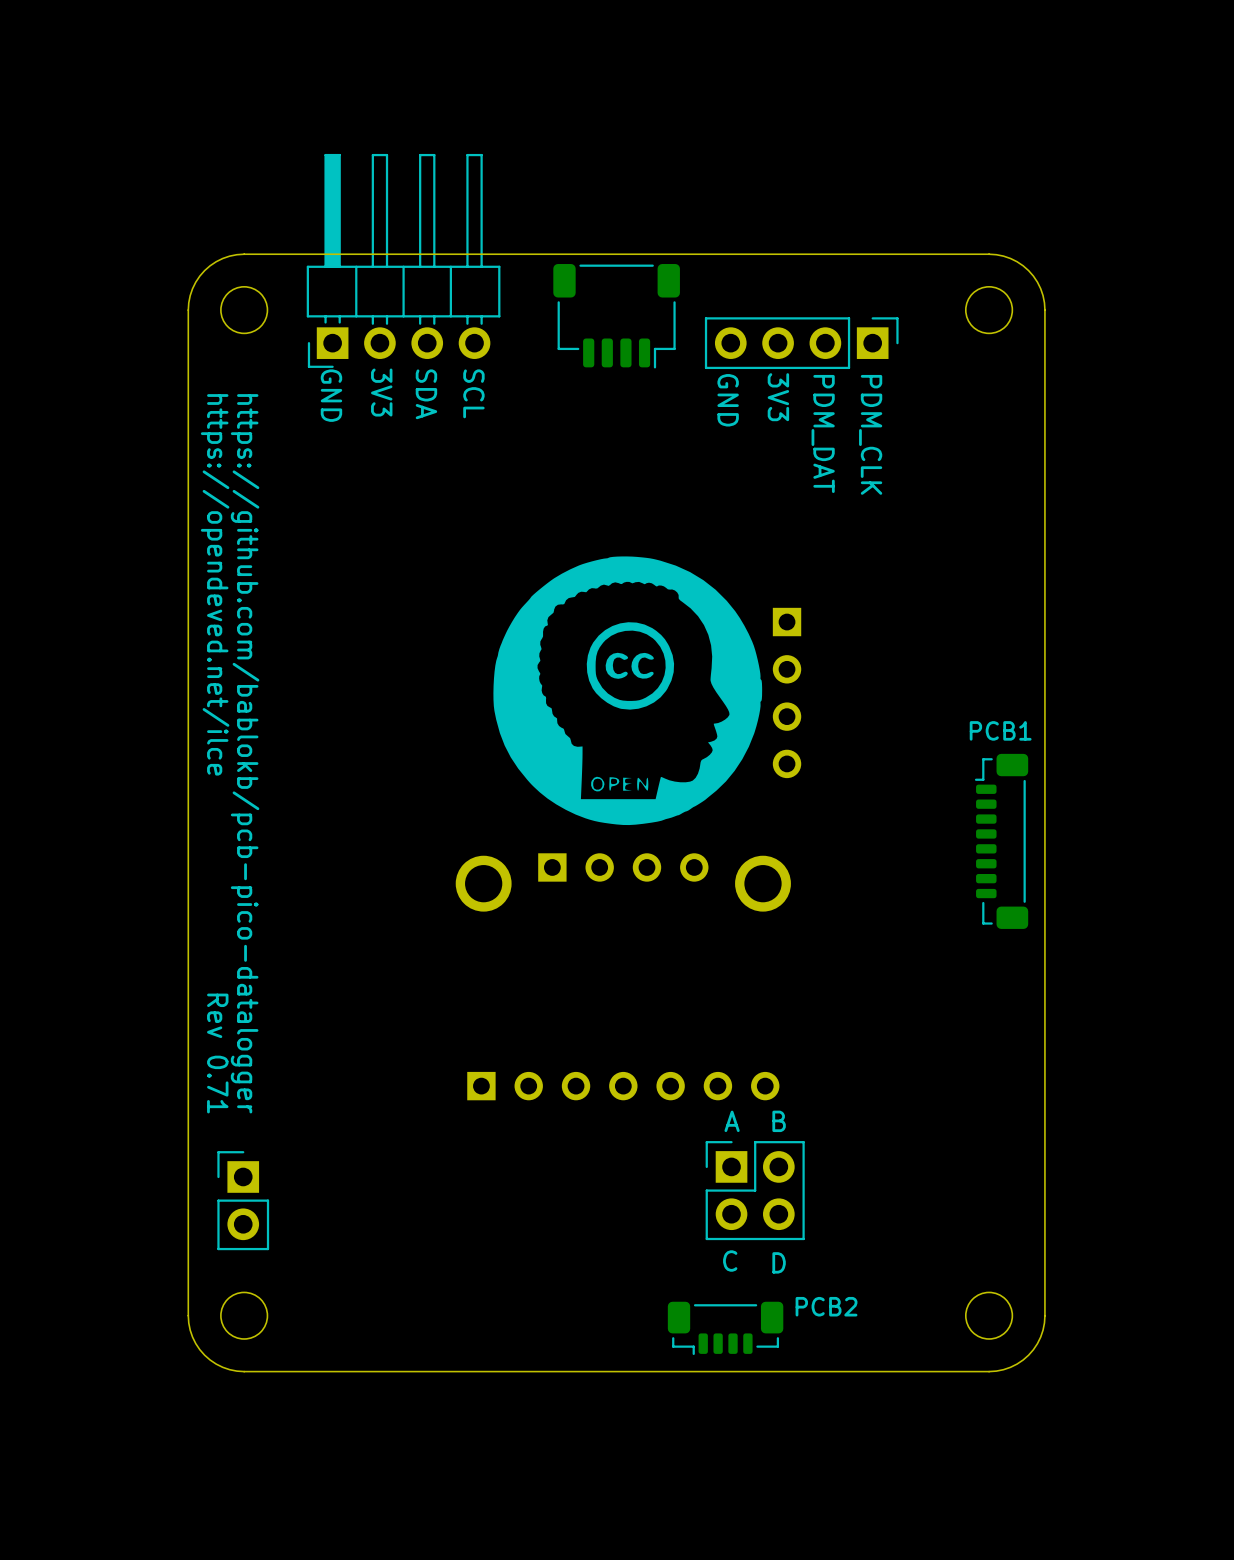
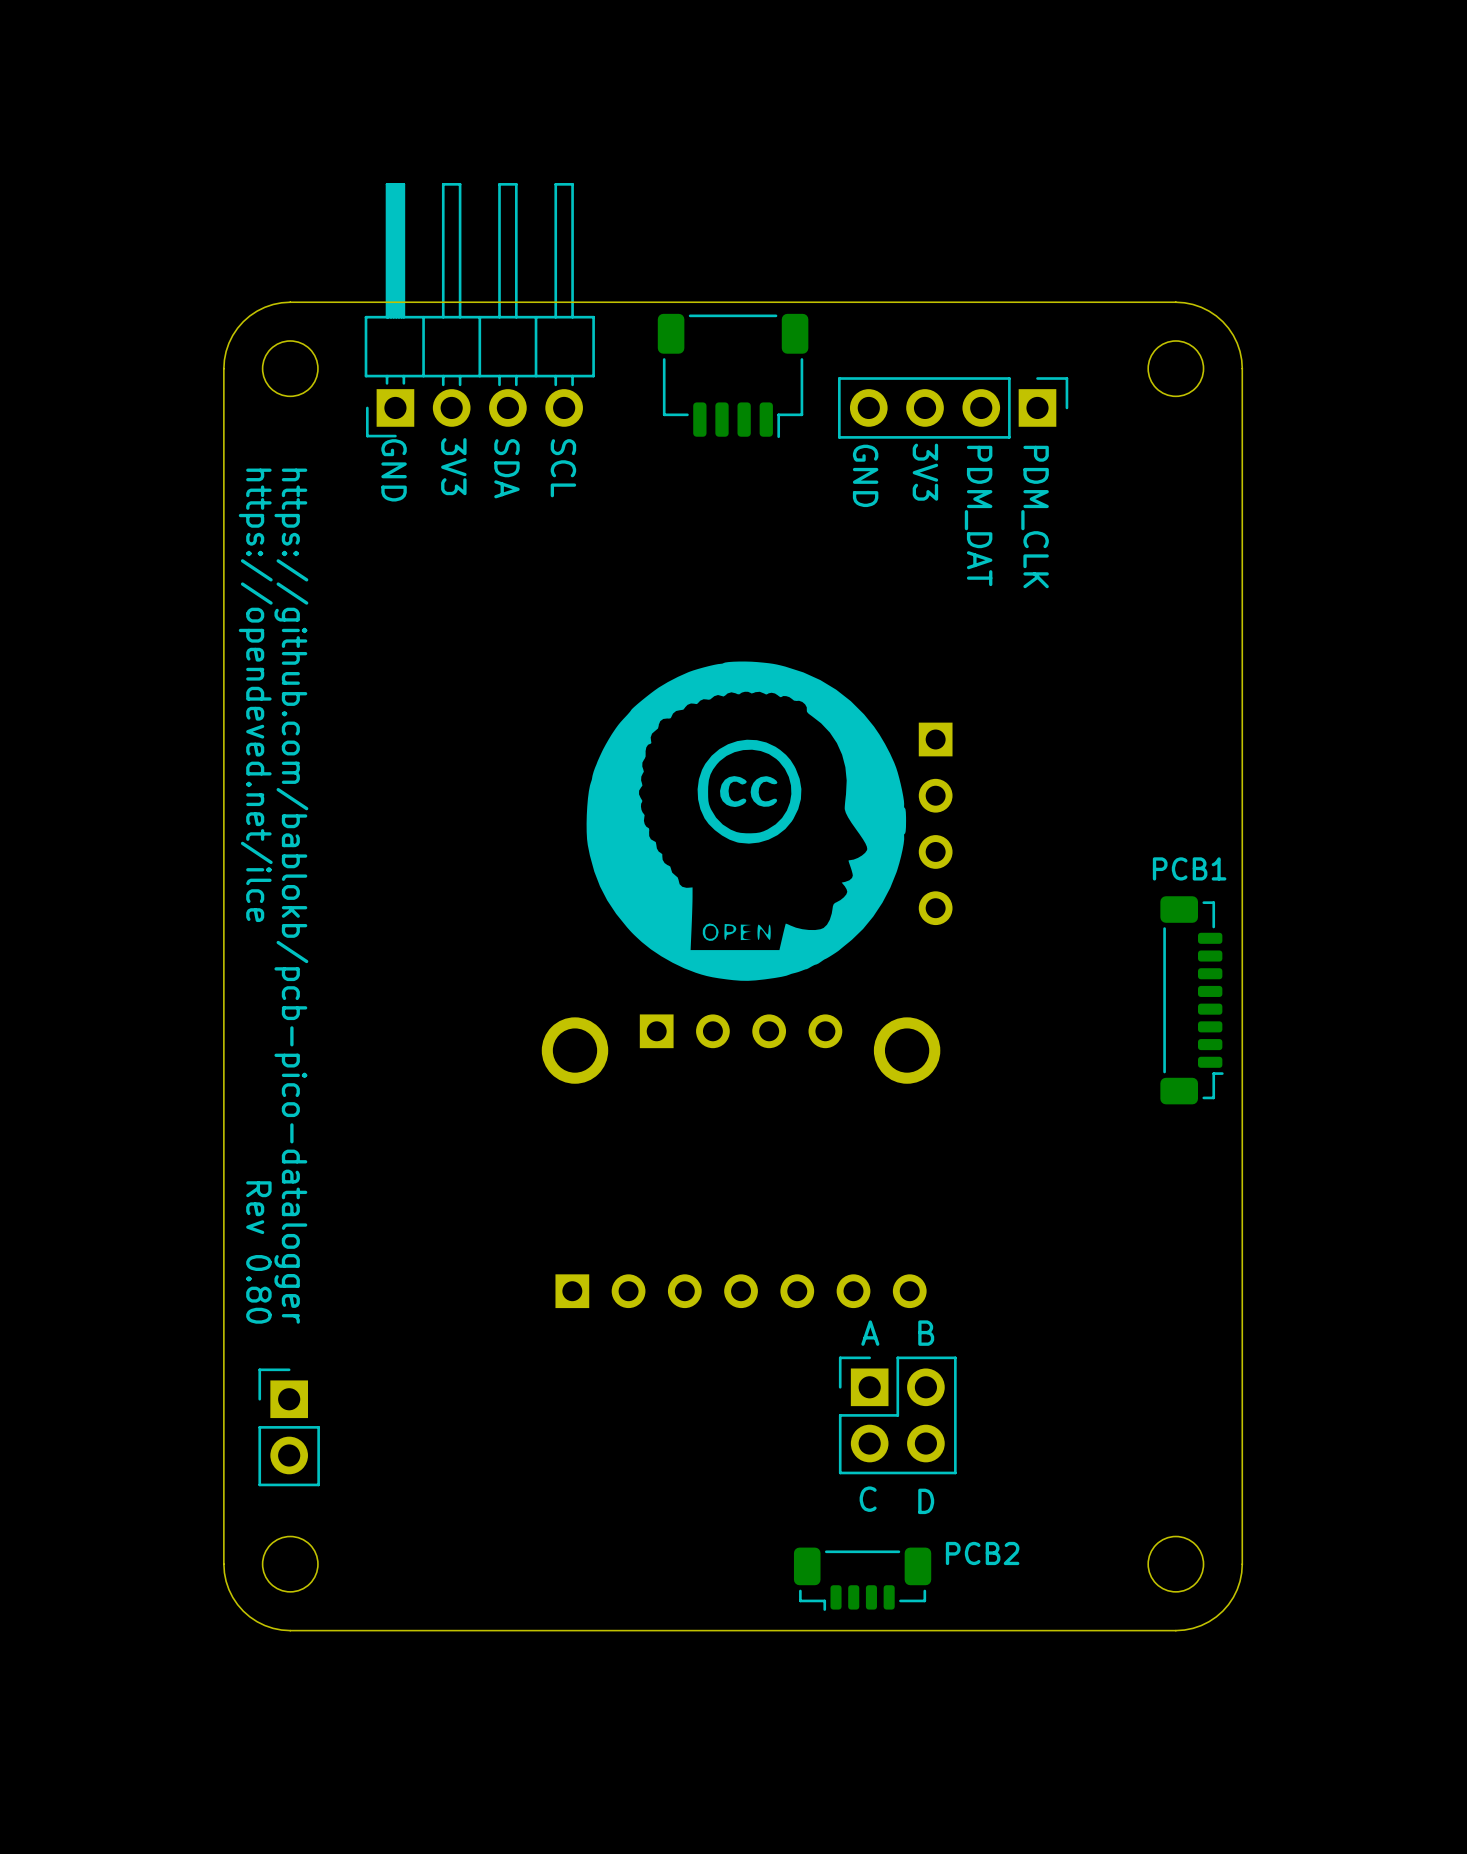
text: https://opendeved.net/ilce Rev 0.71 (215, 753) -> https://opendeved.net/ilce Rev 0.80 (255, 896)
part rotation: 0° (1001, 841) -> 180° (1192, 1000)

